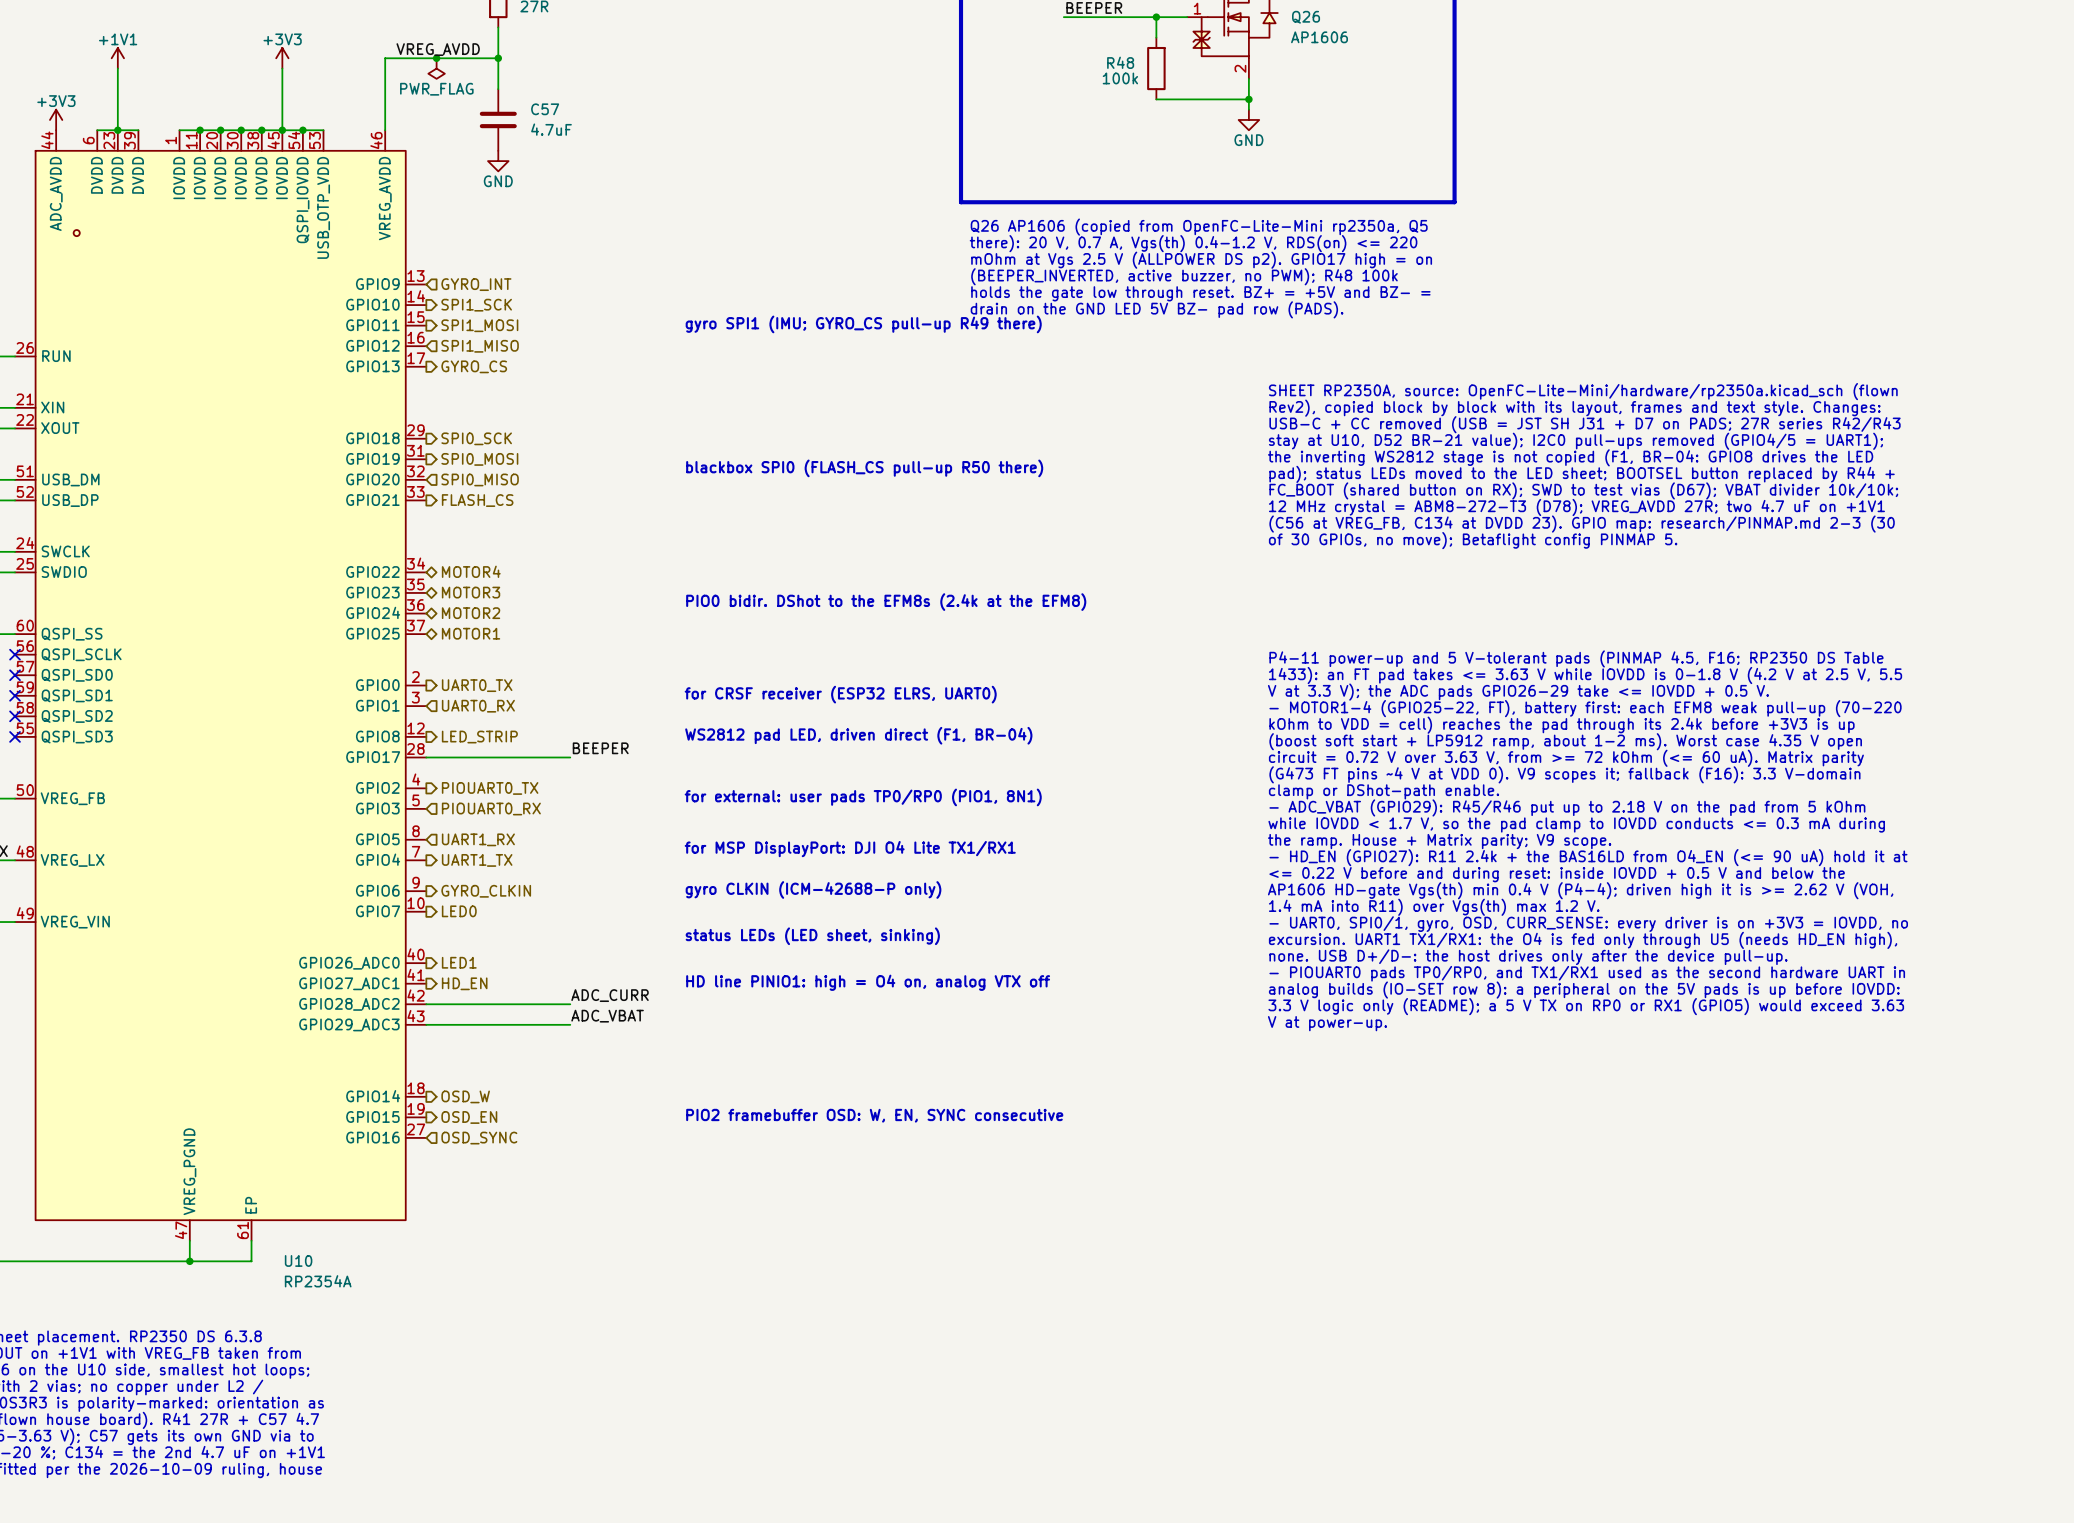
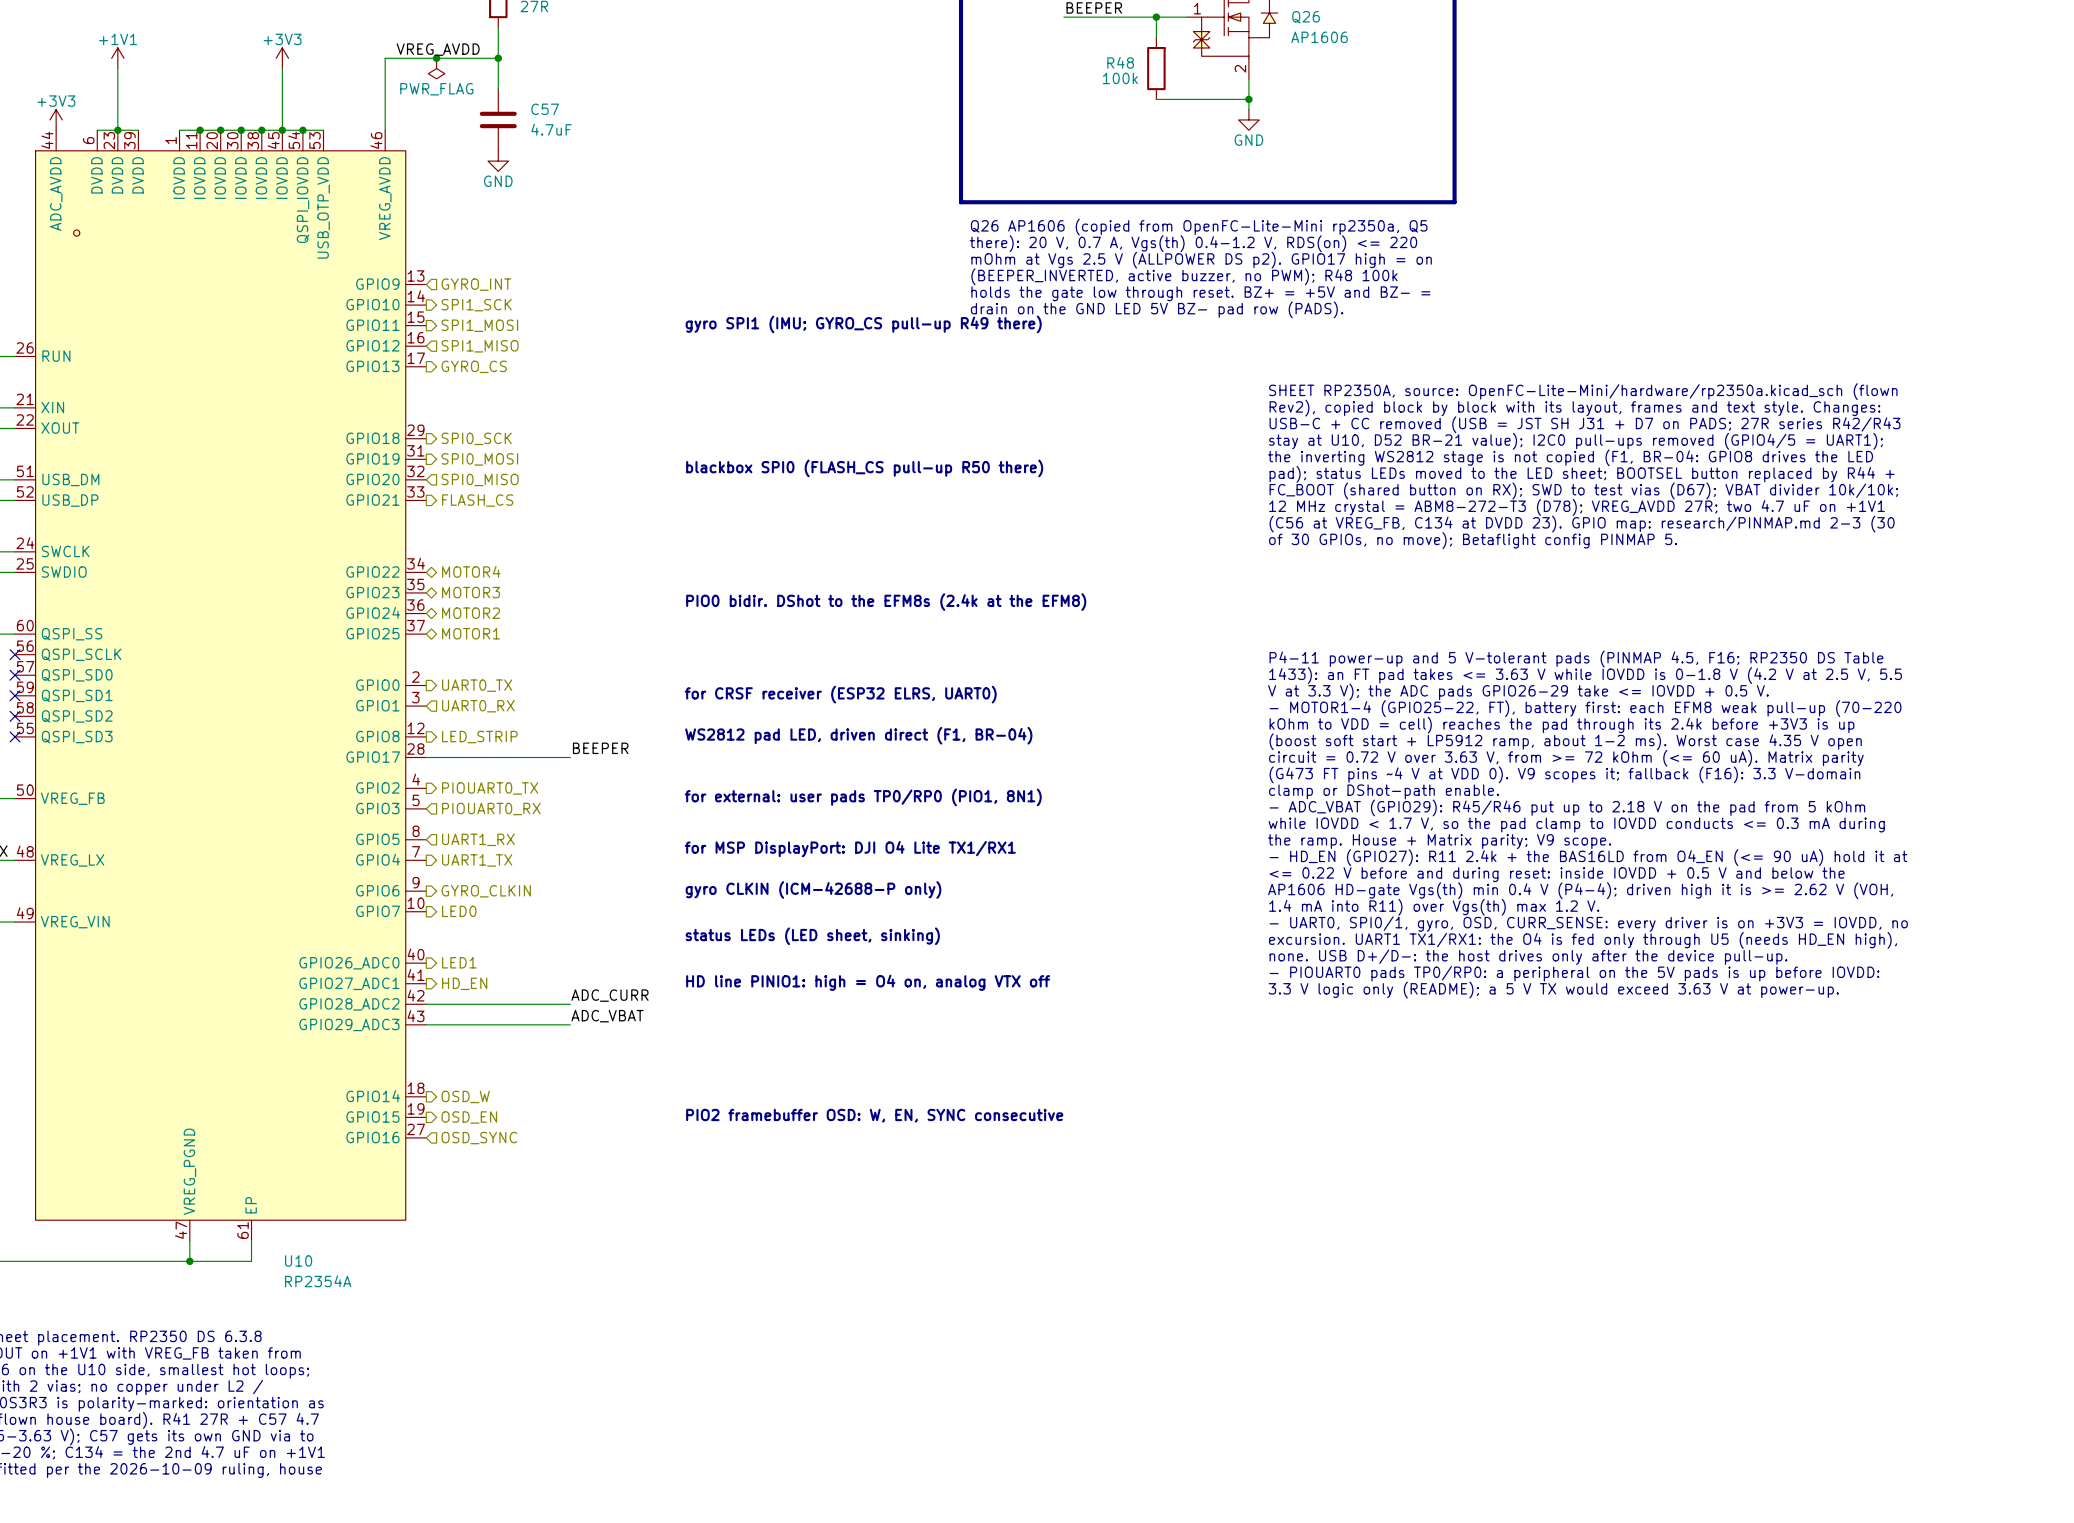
text: - PIOUART0 pads TP0/RP0, and TX1/RX1 used as the second hardware UART in (1587, 973) -> - PIOUART0 pads TP0/RP0: a peripheral on the 5V pads is up before IOVDD: (1574, 973)
text: analog builds (IO-SET row 8): a peripheral on the 5V pads is up before IOVDD: (1584, 990) -> 3.3 V logic only (README); a 5 V TX would exceed 3.63 V at power-up. (1553, 990)
text: 3.3 V logic only (README); a 5 V TX on RP0 or RX1 (GPIO5) would exceed 3.63 (1586, 1006) -> none
text: V at power-up. (1327, 1023) -> none

